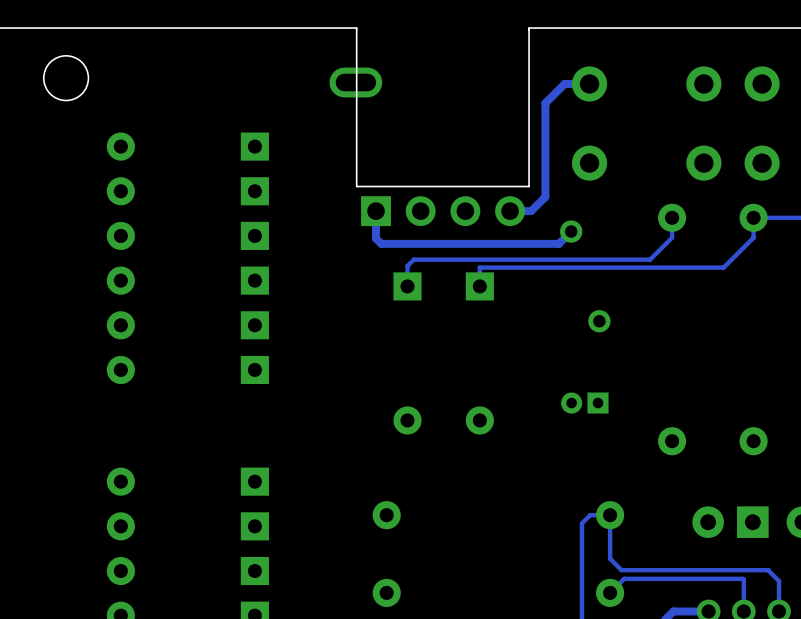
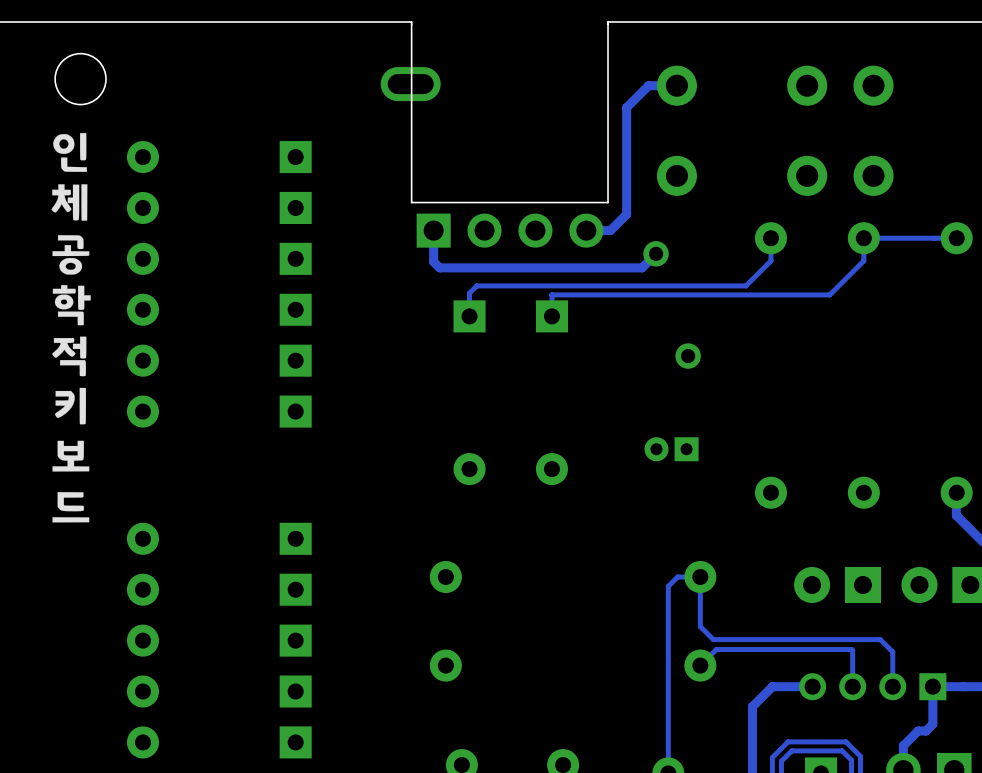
drawing: none -> [51, 133, 91, 523]

